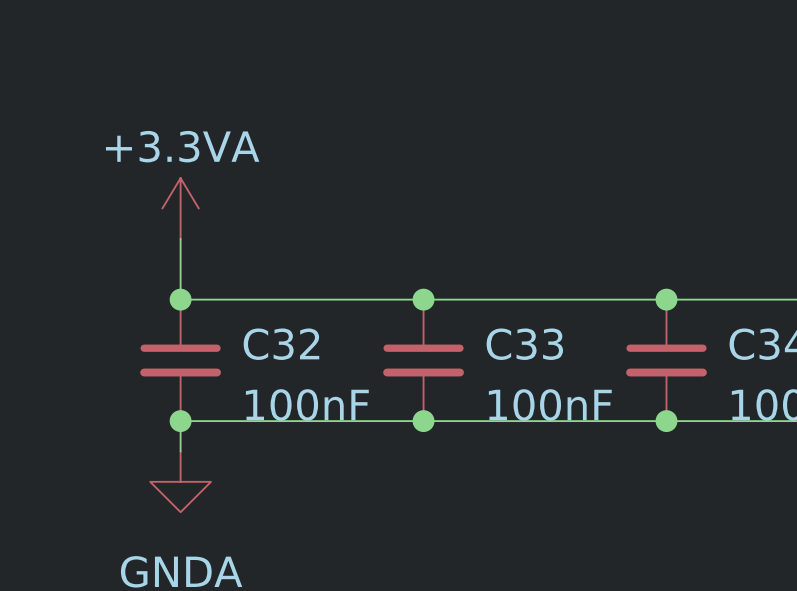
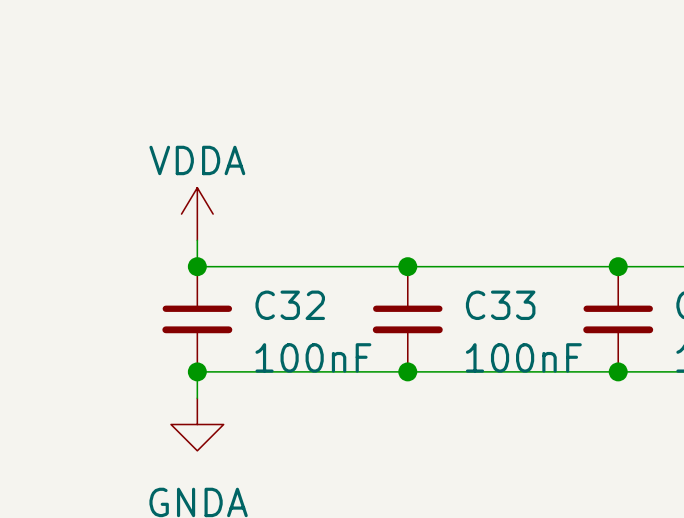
power symbol: +3.3VA (180, 208) -> none
power symbol: none -> VDDA (197, 214)

